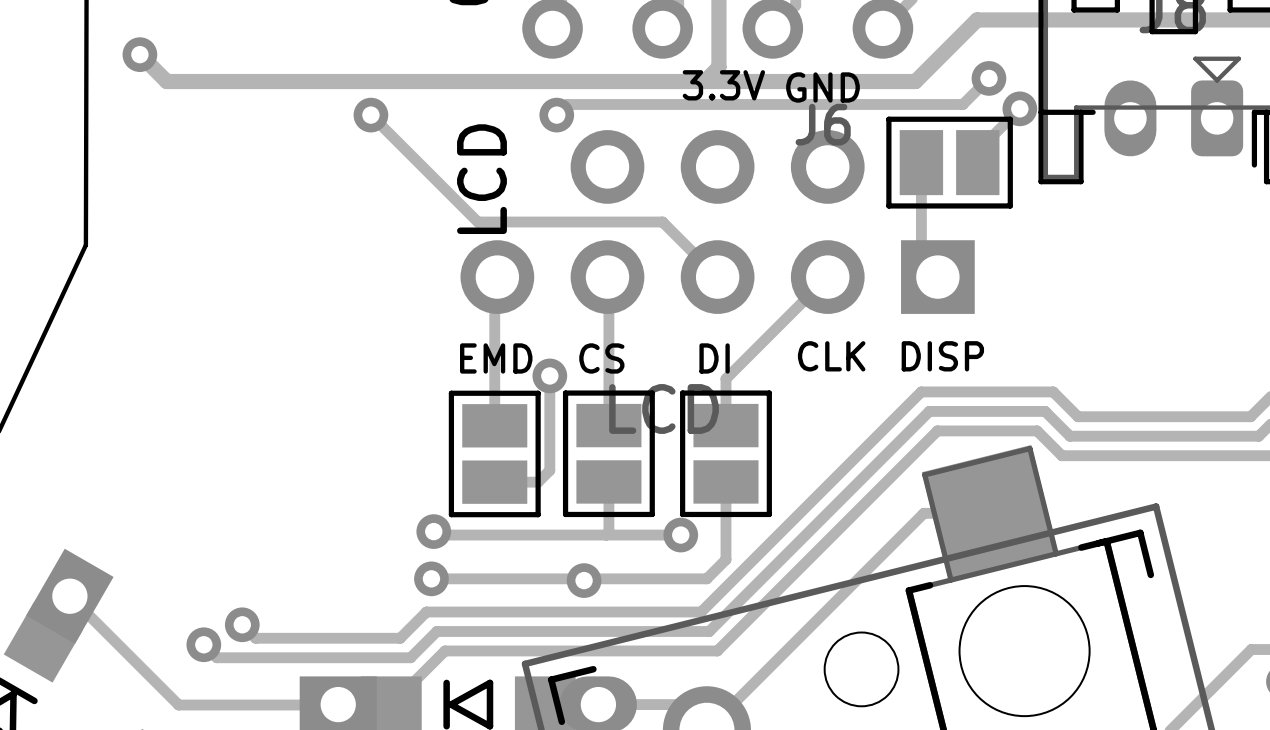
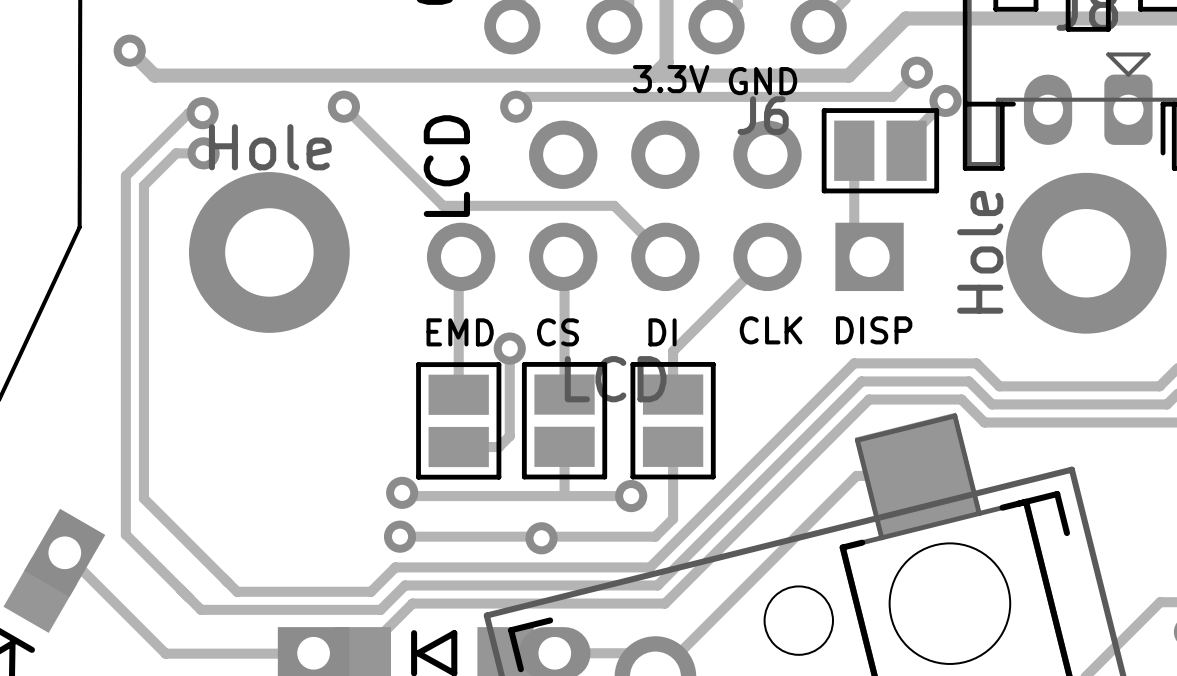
track: none -> (202, 113) (188, 113) (125, 176) (125, 534) (188, 597)
via: none -> (202, 113)
track: none -> (203, 153) (176, 153) (143, 185) (143, 498) (227, 582)
via: none -> (203, 153)
part: none -> Hole (269, 252)
part: none -> Hole (1086, 253)
via: (242, 624) -> none
via: (203, 644) -> none

